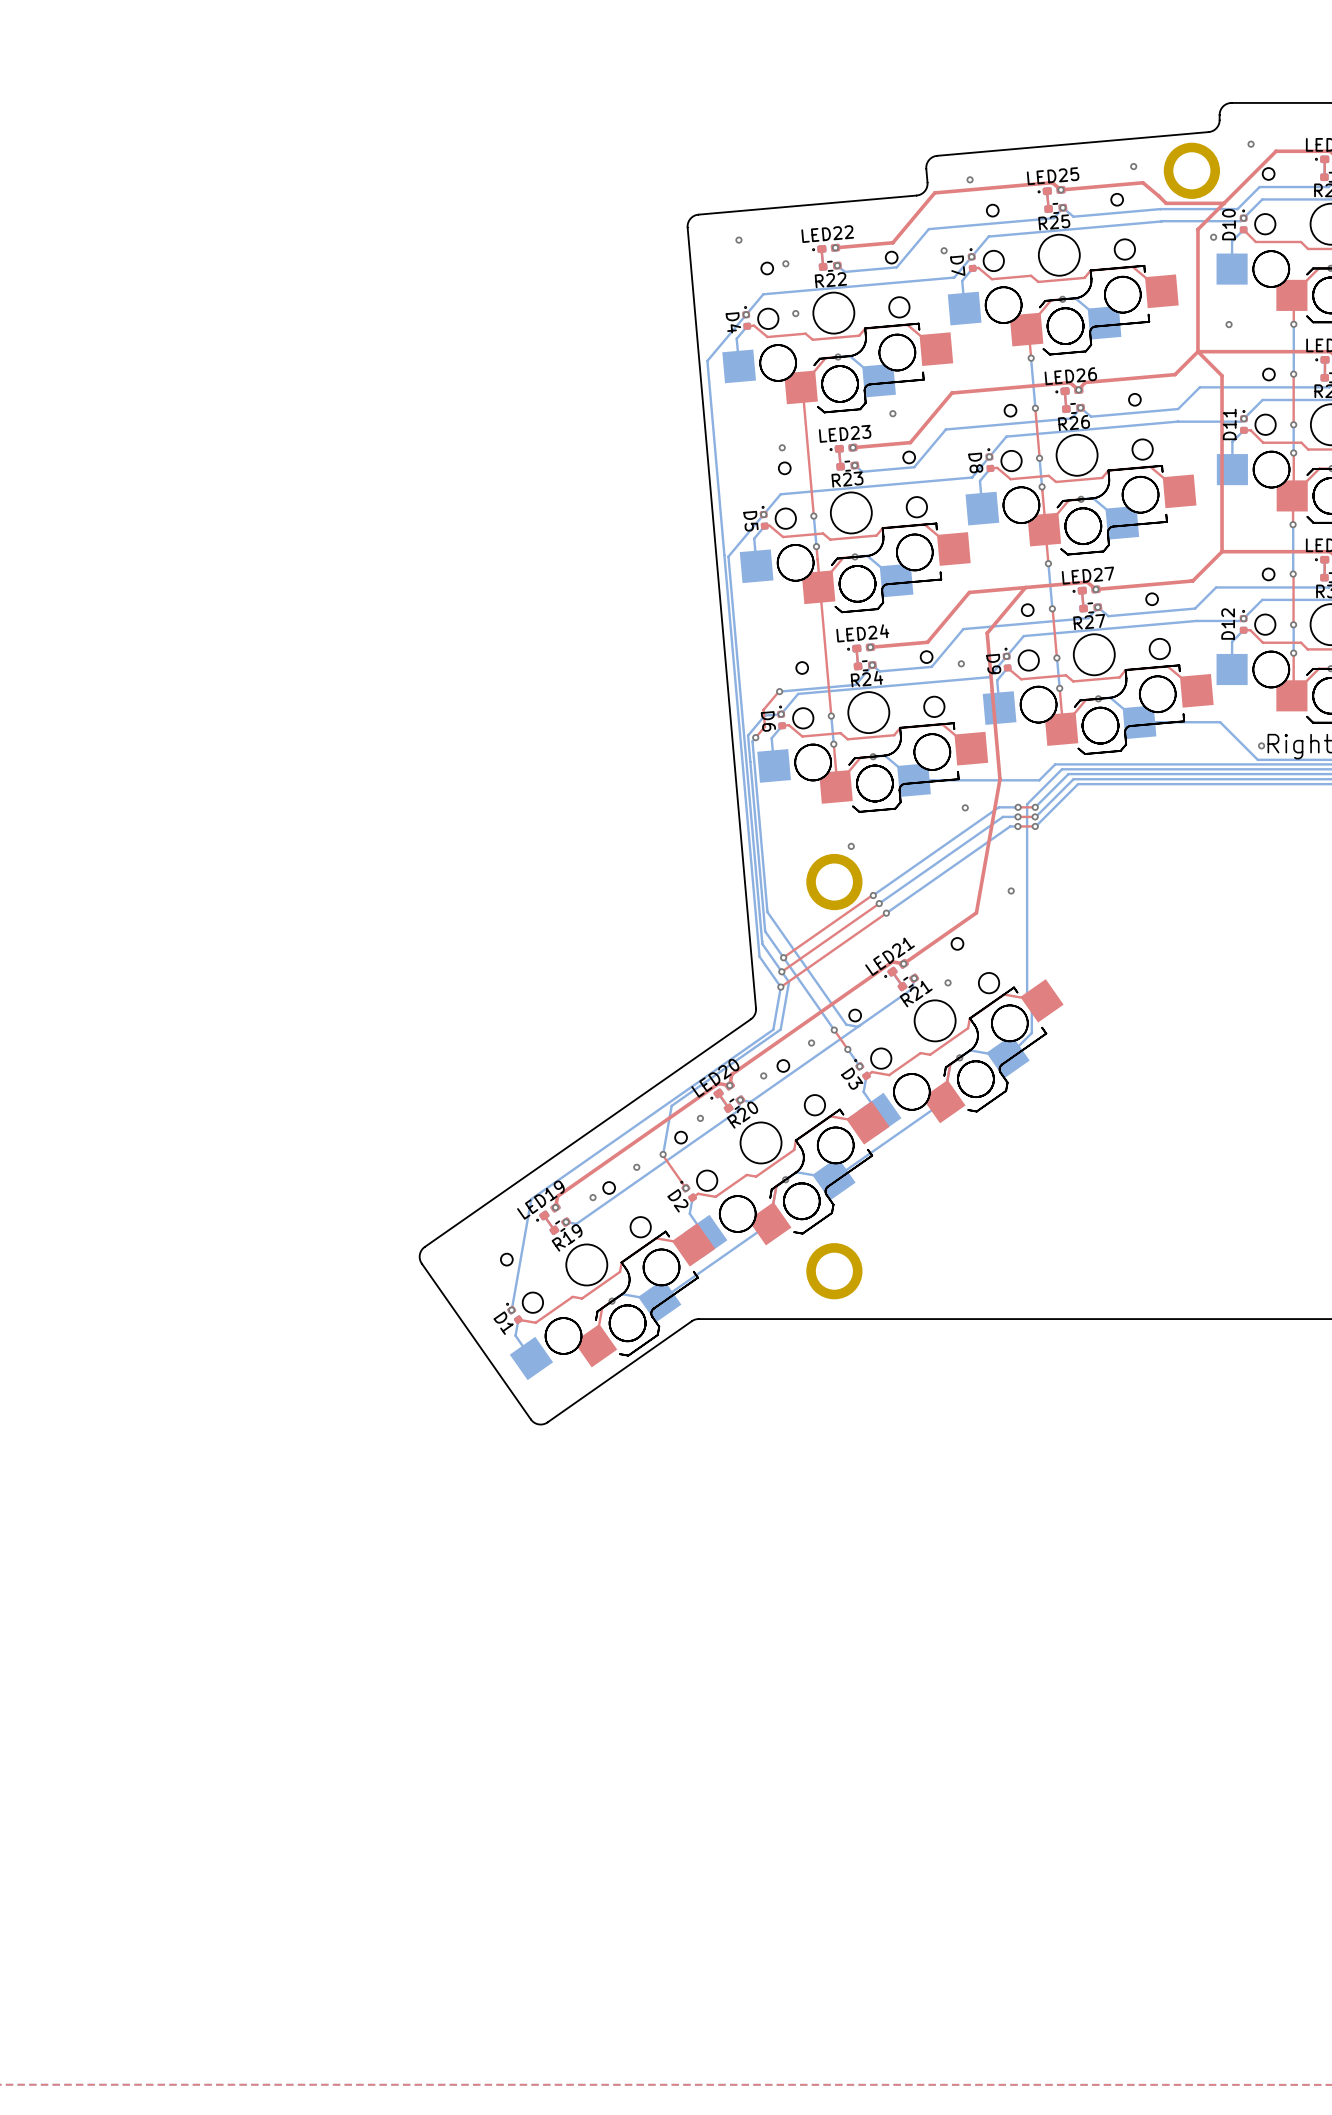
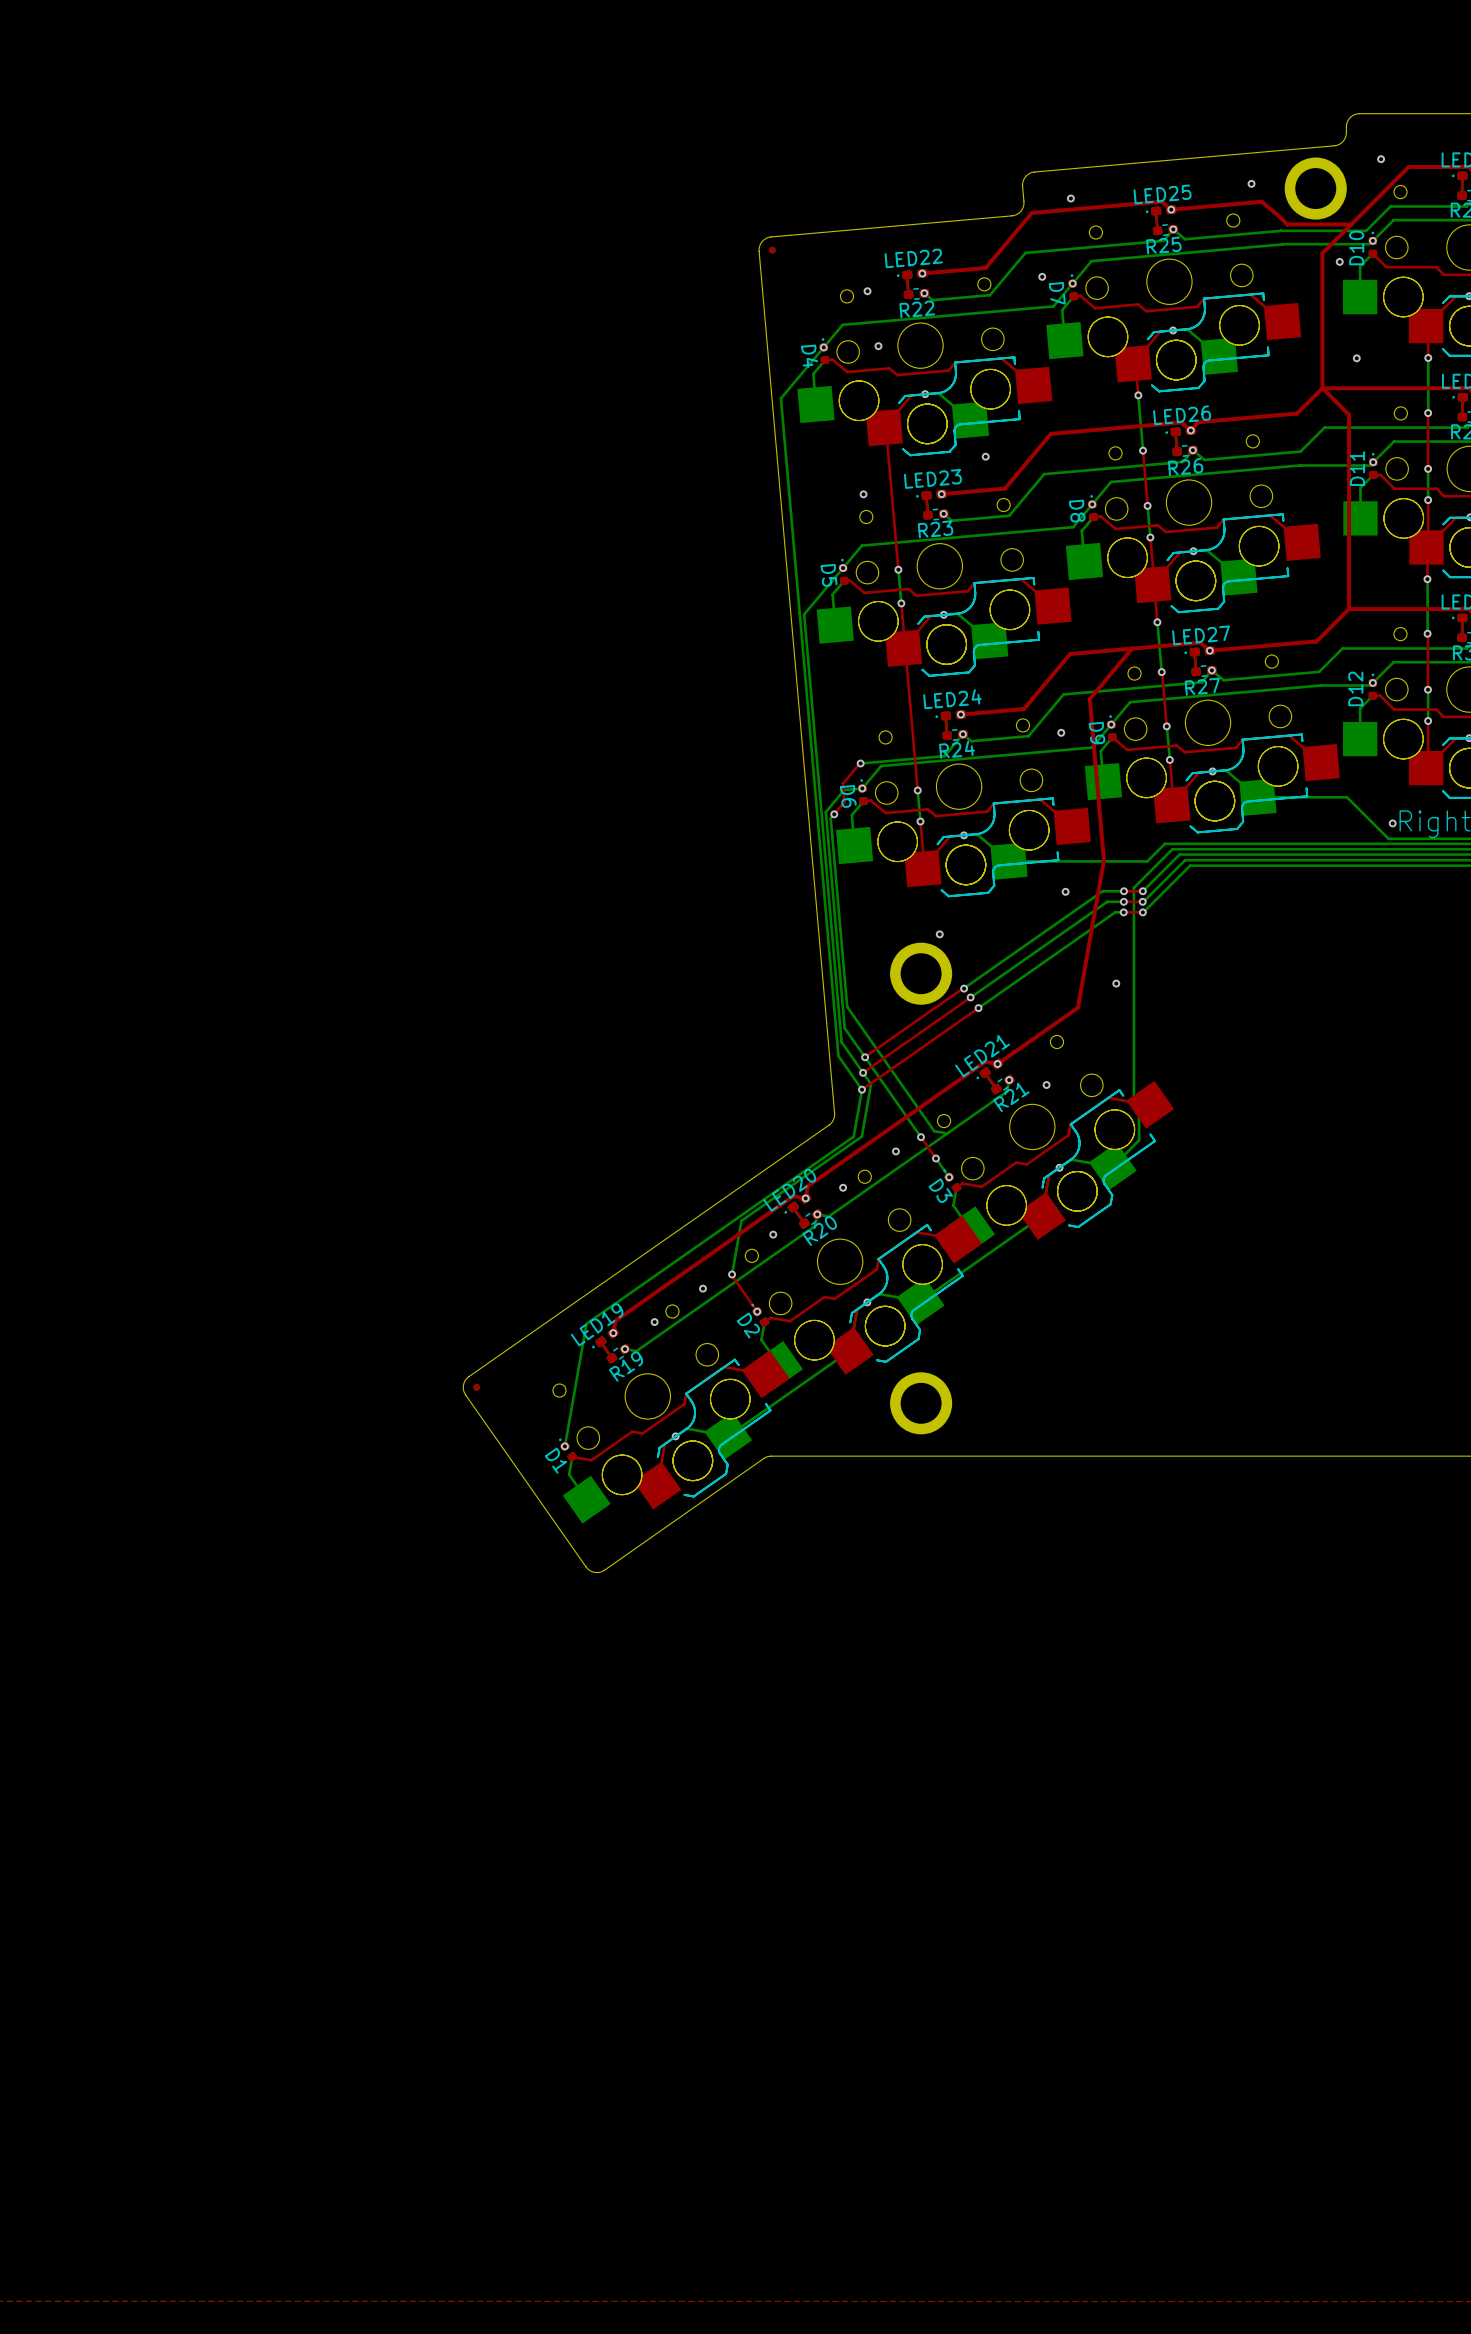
part: none -> (772, 250)
via: (738, 240) -> none
part: none -> (476, 1387)

